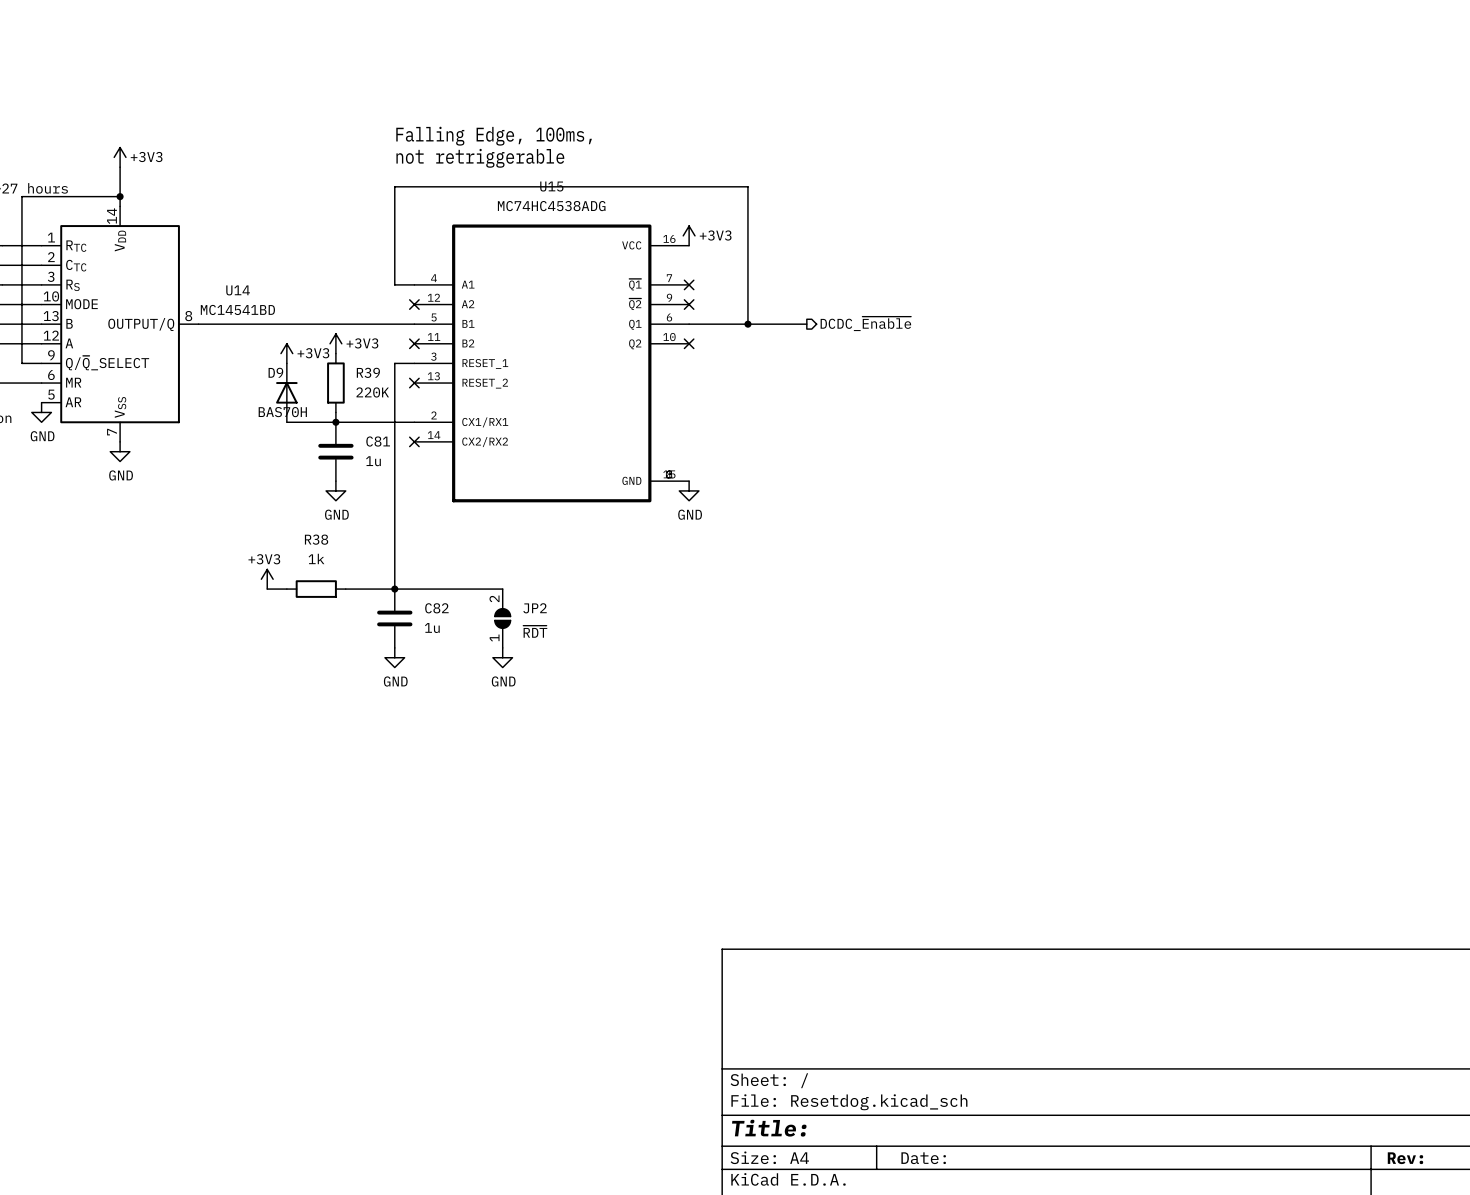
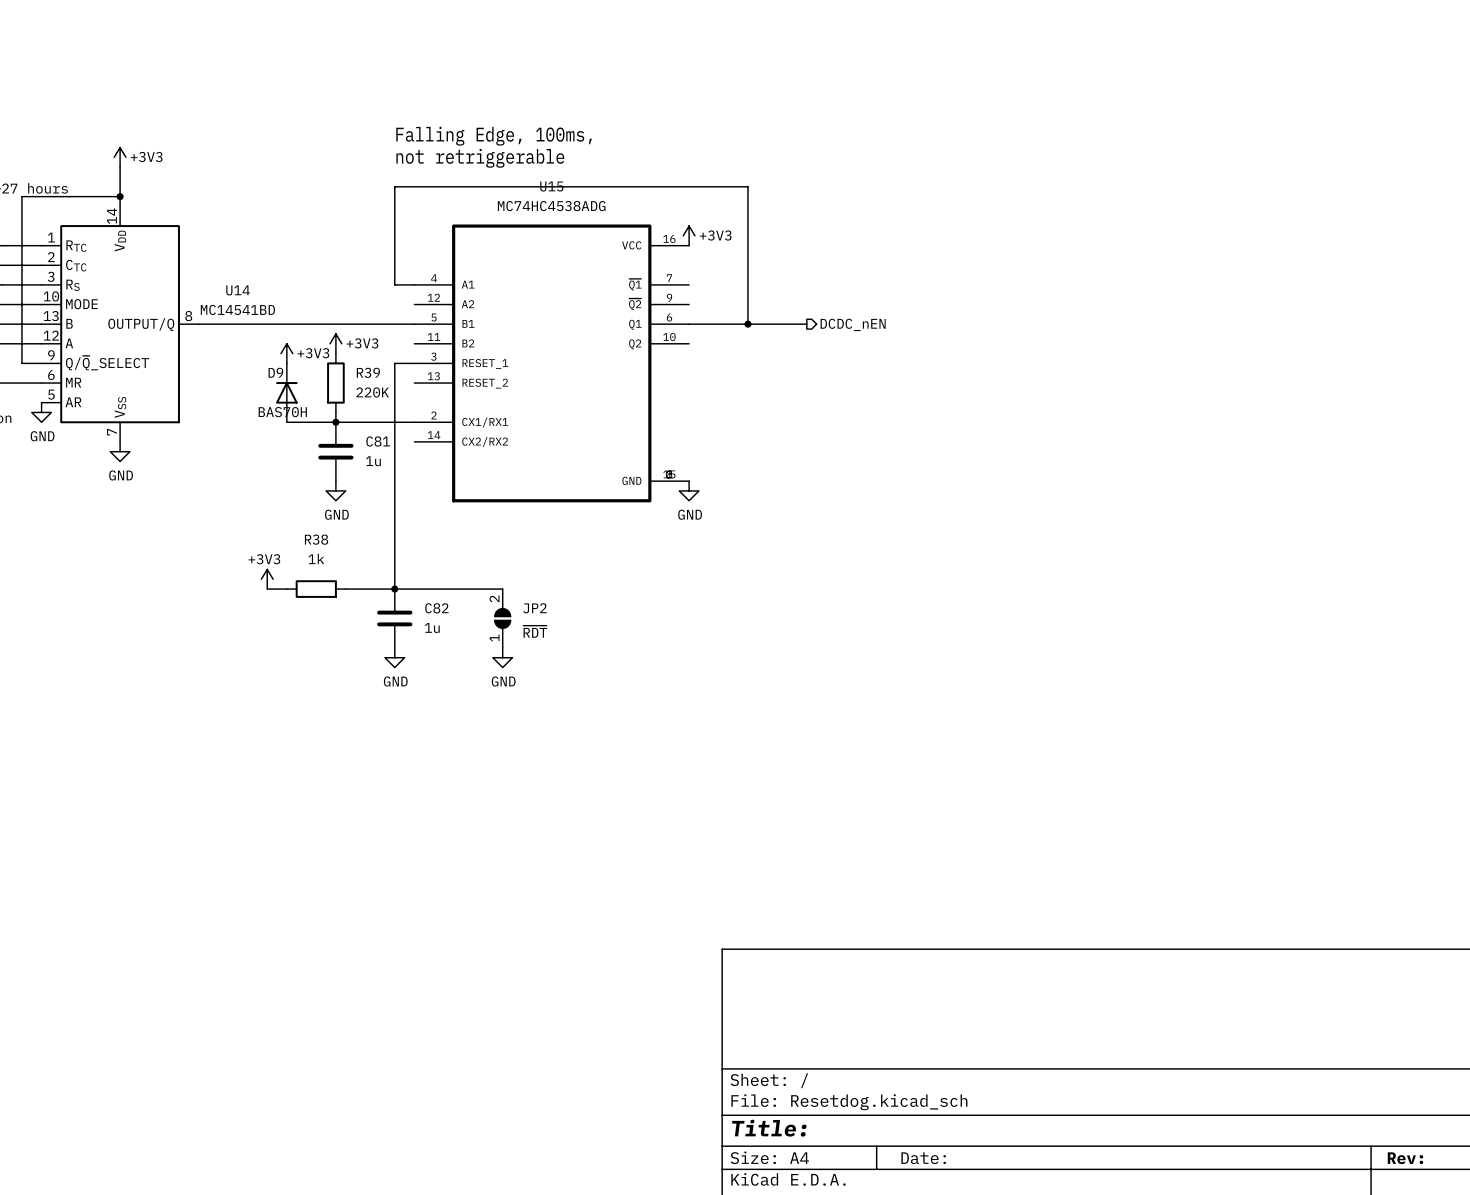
no-connect mark: (689, 284) -> none
no-connect mark: (414, 304) -> none
no-connect mark: (689, 304) -> none
hierarchical label: DCDC_~{Enable} (865, 323) -> DCDC_nEN (853, 324)
no-connect mark: (414, 343) -> none
no-connect mark: (689, 343) -> none
no-connect mark: (414, 383) -> none
no-connect mark: (414, 441) -> none

